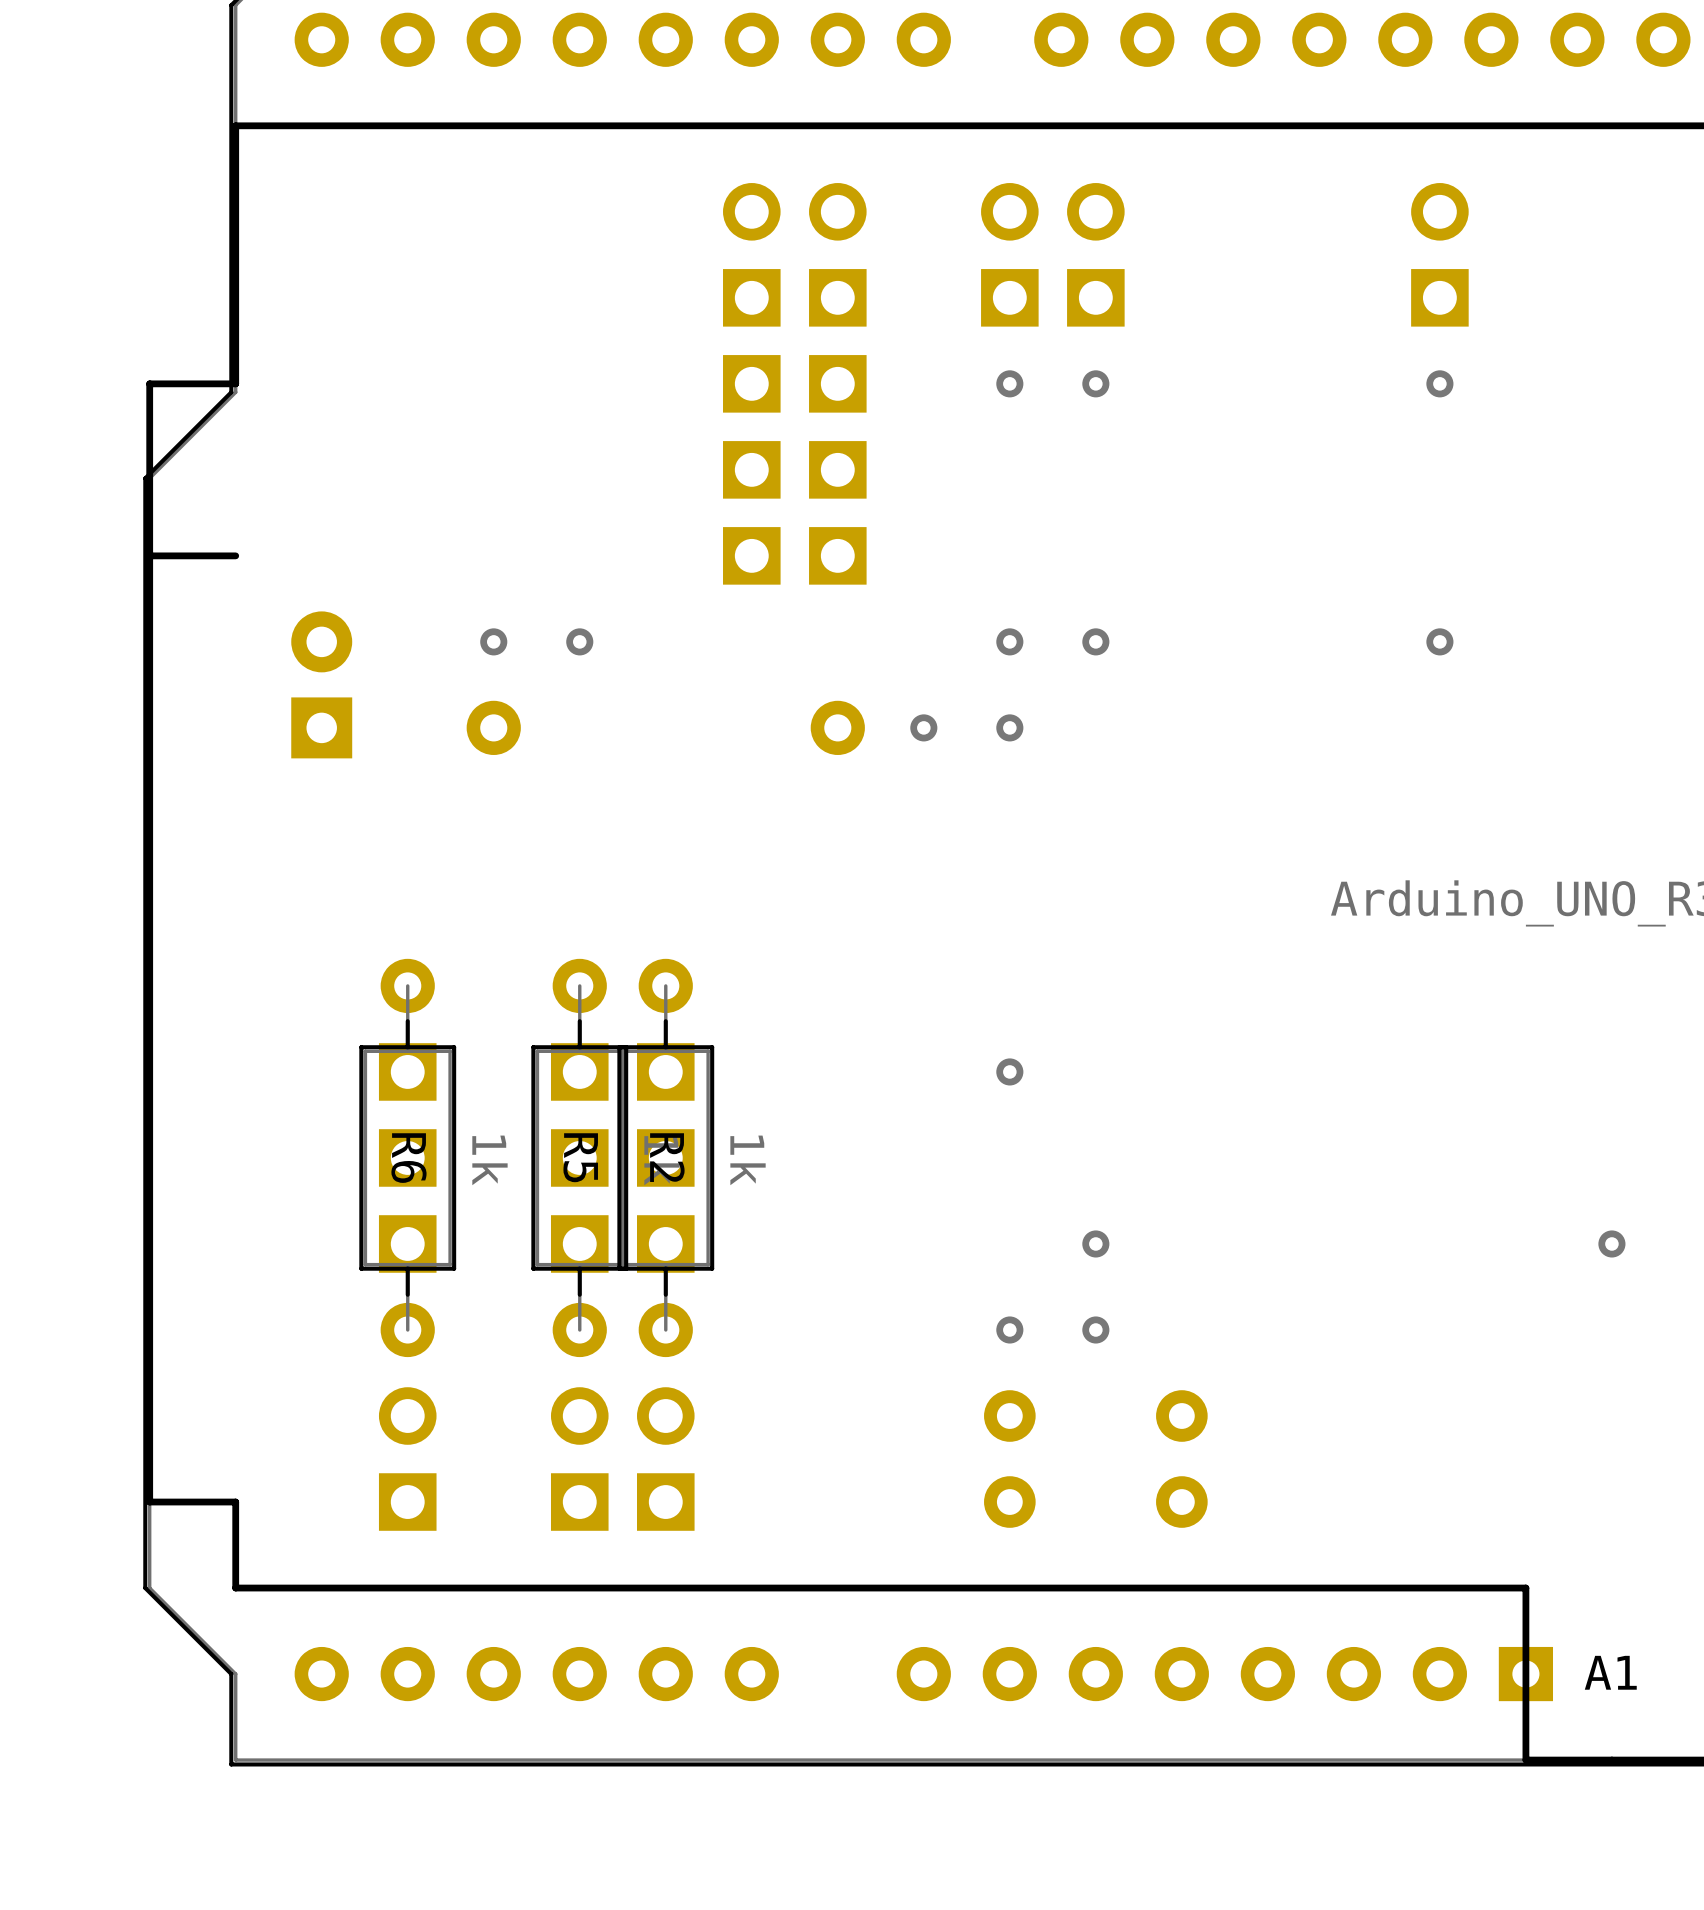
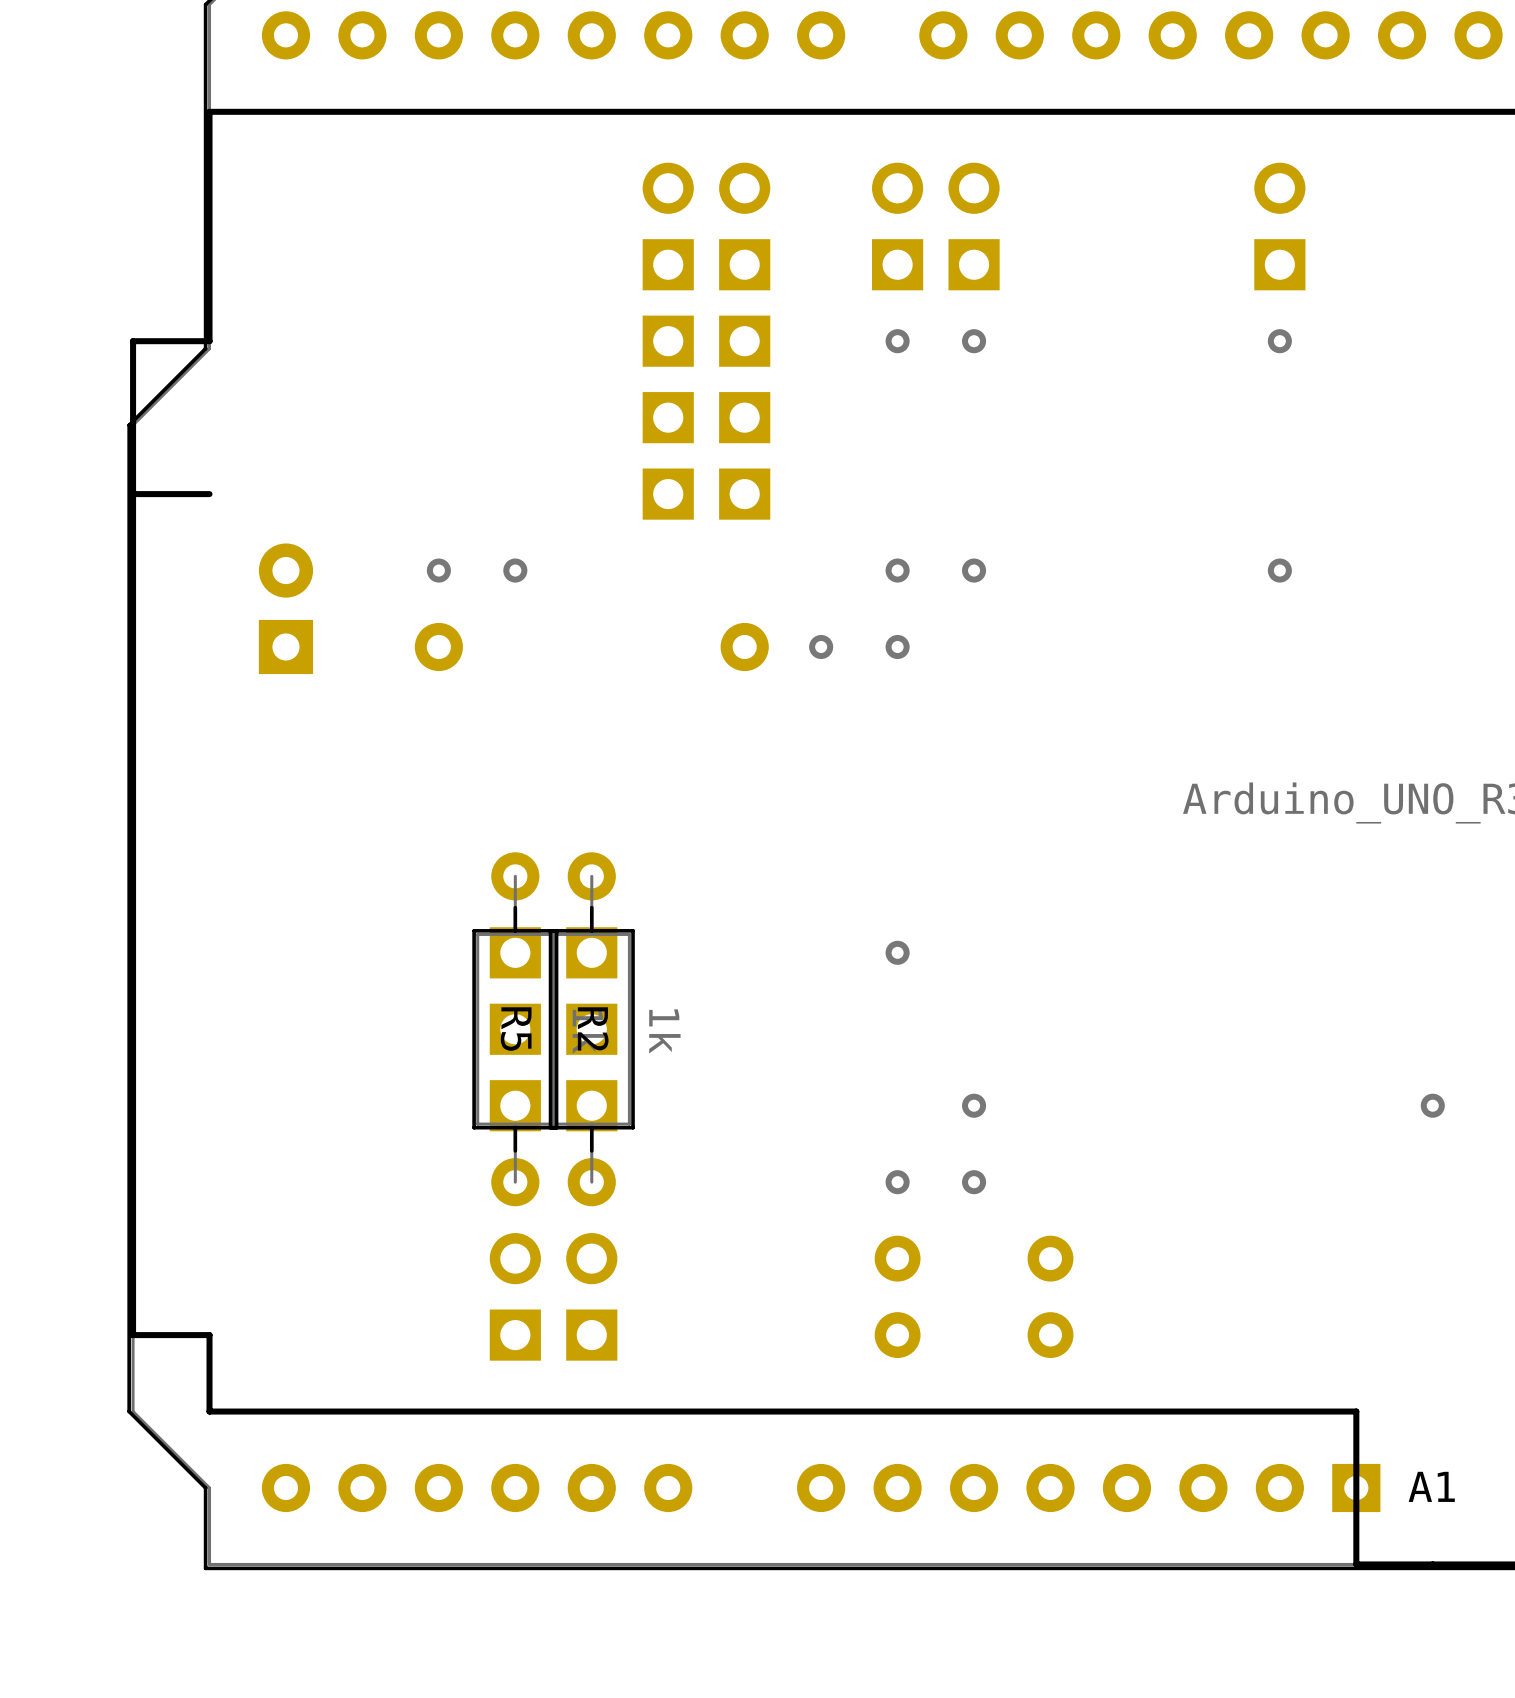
part: (407, 1071) -> none
part: (407, 1157) -> none
R6: 1k (407, 1157) -> none
part: (407, 1243) -> none
part: (407, 1459) -> none

